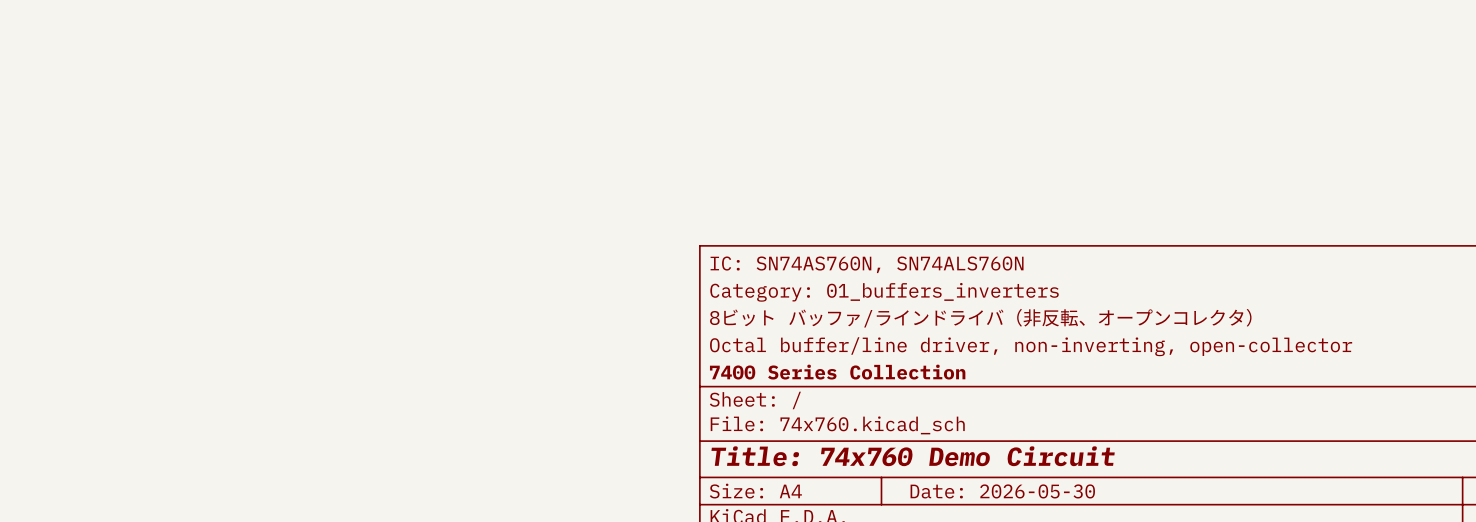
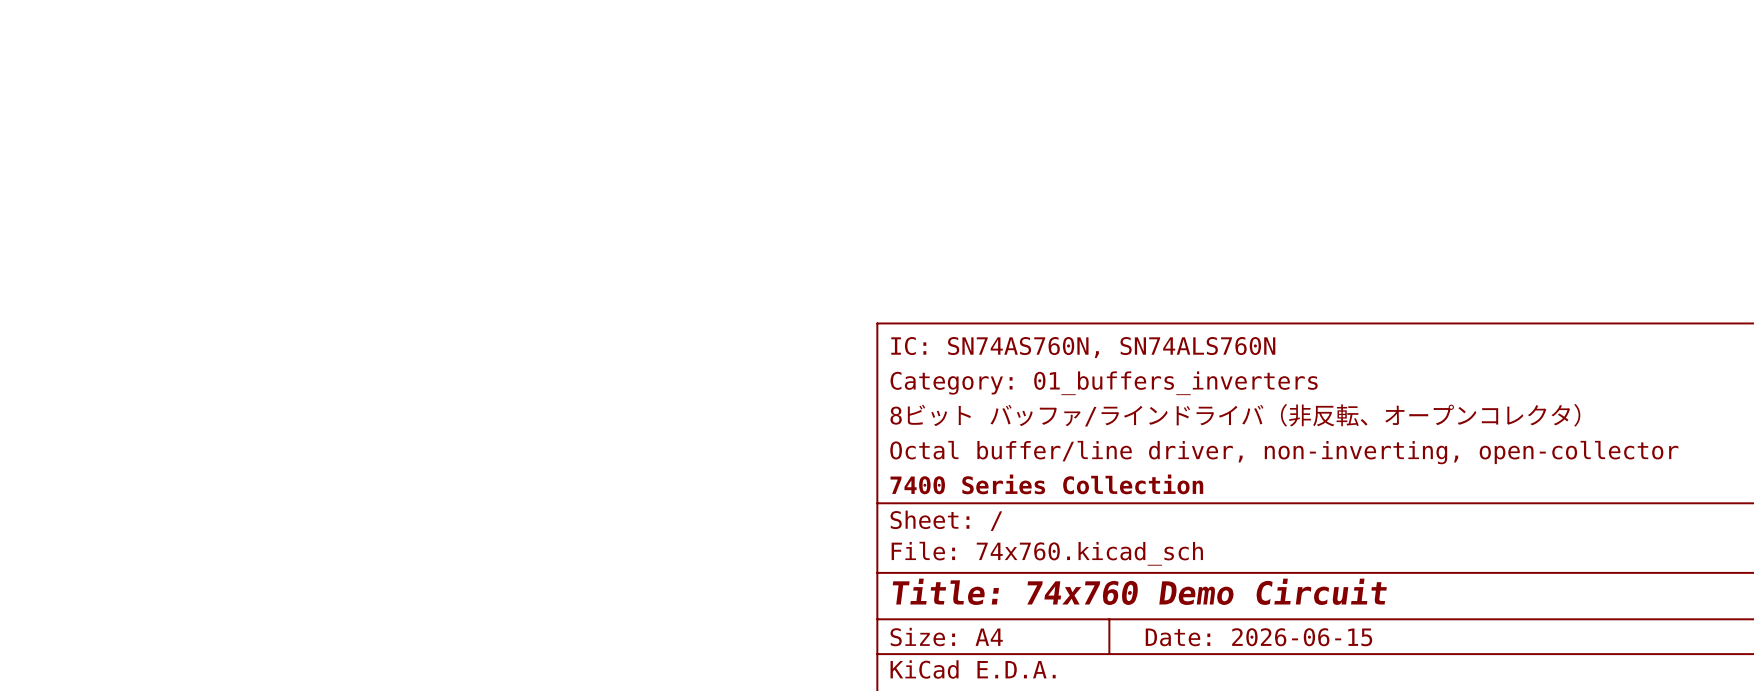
title block: Date: 2026-05-30 (1002, 491) -> Date: 2026-06-15 (1258, 637)

